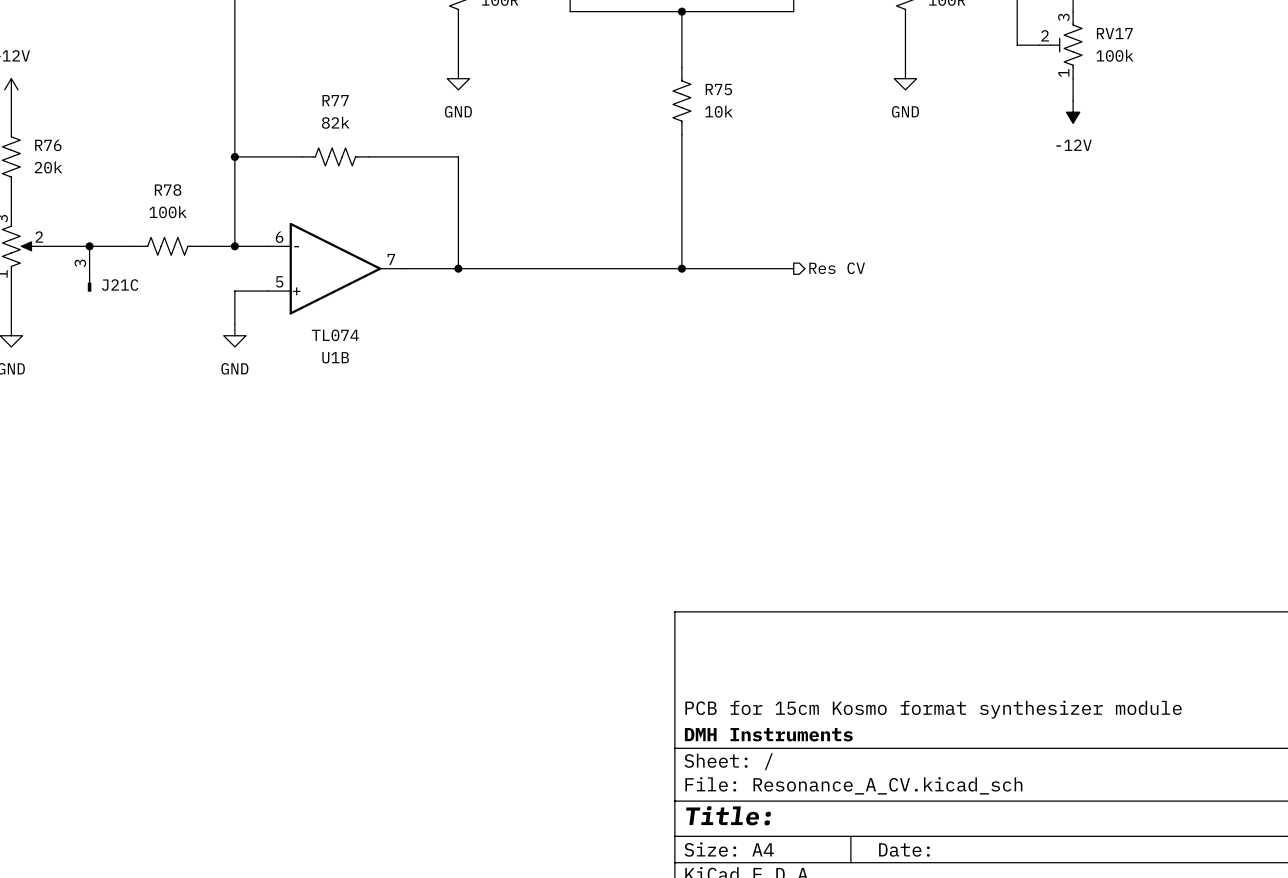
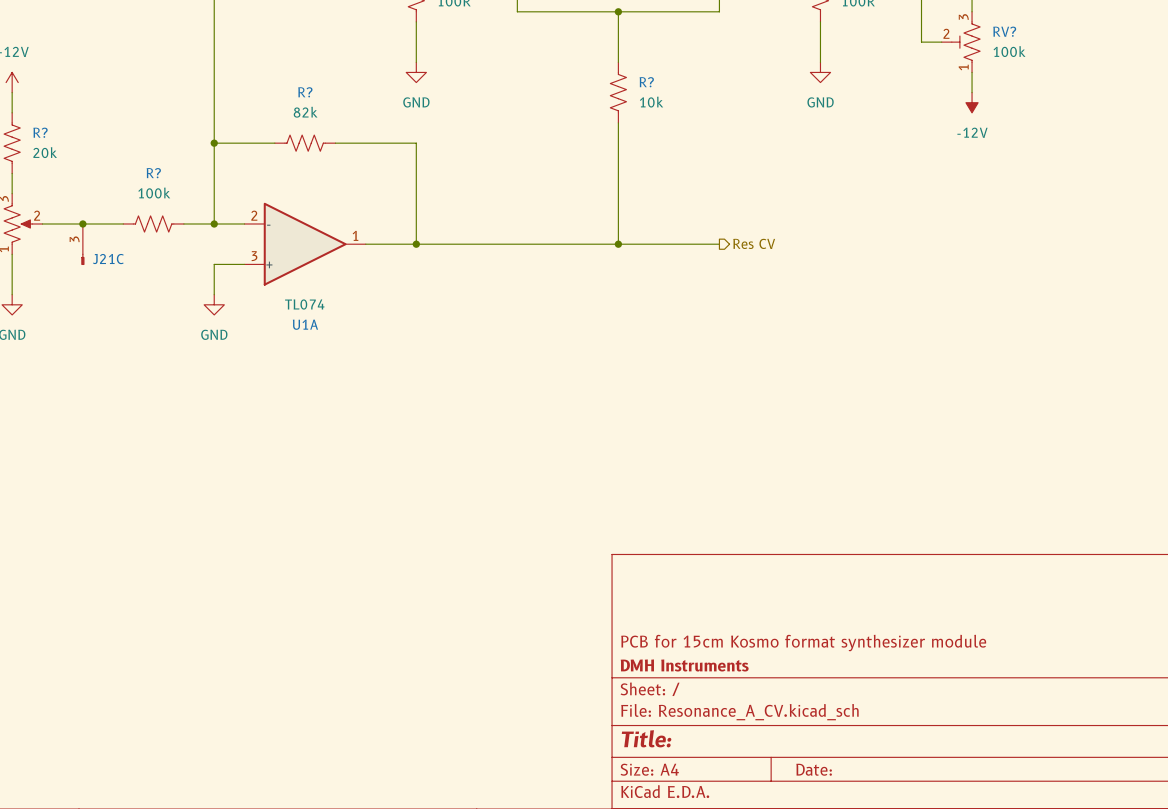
RV17 name: RV17 (1114, 33) -> RV? (1004, 31)
R75 name: R75 (718, 89) -> R? (646, 82)
R77 name: R77 (335, 100) -> R? (305, 92)
R76 name: R76 (48, 145) -> R? (40, 132)
R78 name: R78 (168, 190) -> R? (153, 173)
U1B pin number: 6 (279, 237) -> 2 (254, 215)
U1B pin number: 7 (391, 259) -> 1 (355, 235)
U1B pin number: 5 (279, 281) -> 3 (254, 256)
U1B name: U1B (335, 357) -> U1A (305, 324)

